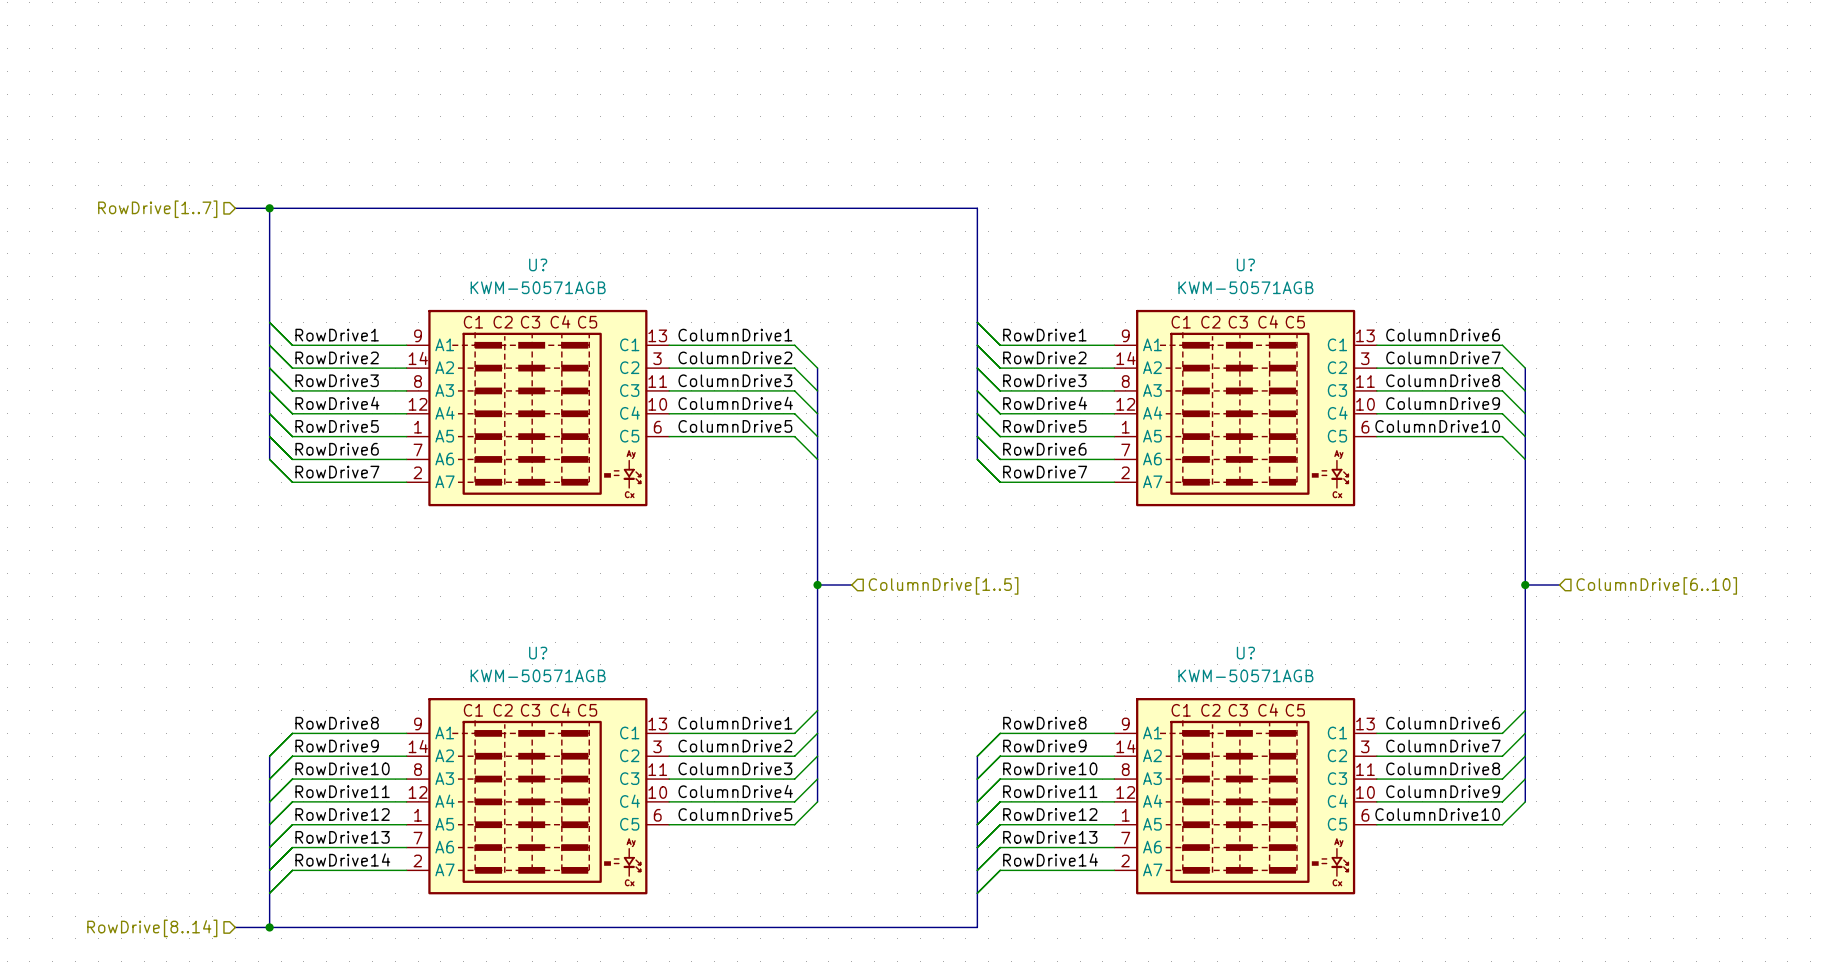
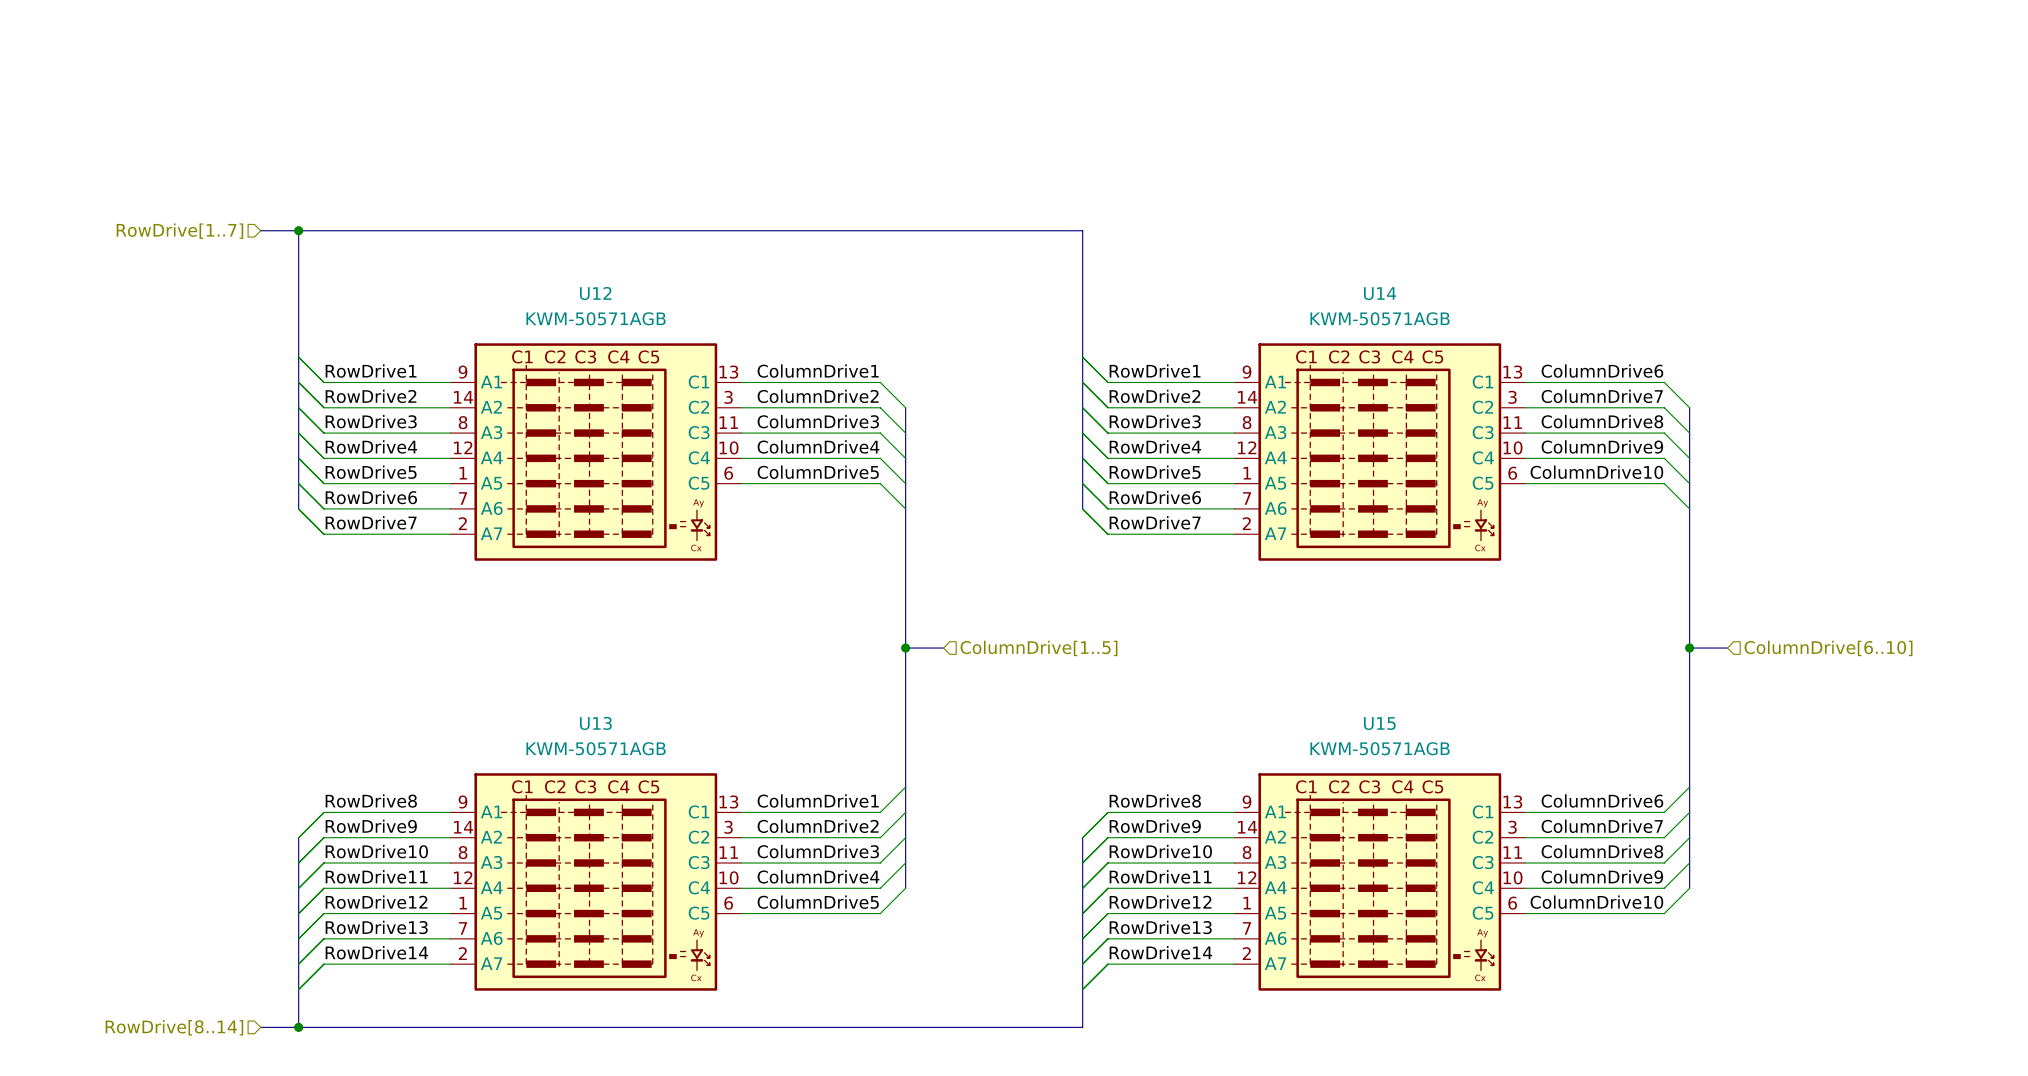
U? name: U? (538, 264) -> U12 (595, 293)
U? name: U? (1245, 264) -> U14 (1380, 293)
U? name: U? (538, 653) -> U13 (595, 723)
U? name: U? (1245, 653) -> U15 (1379, 723)

